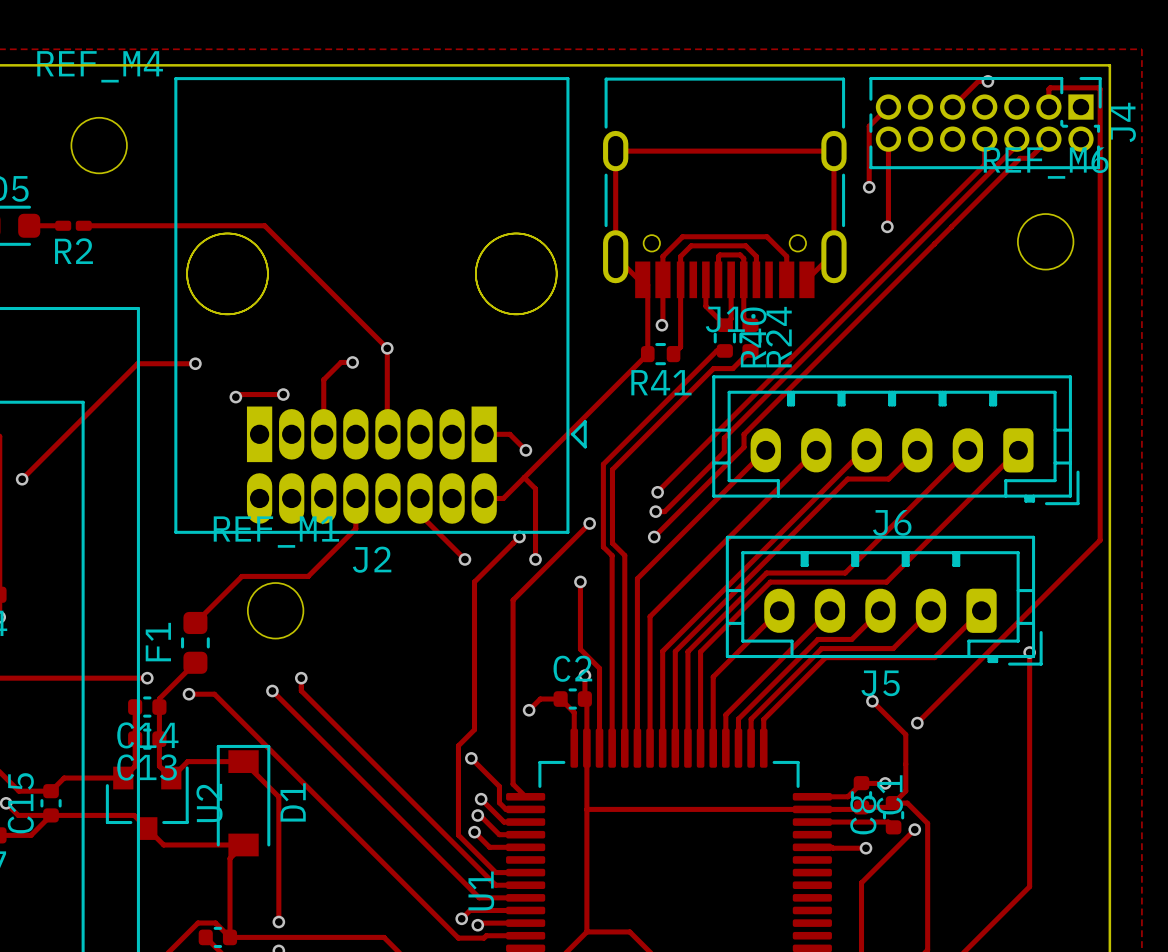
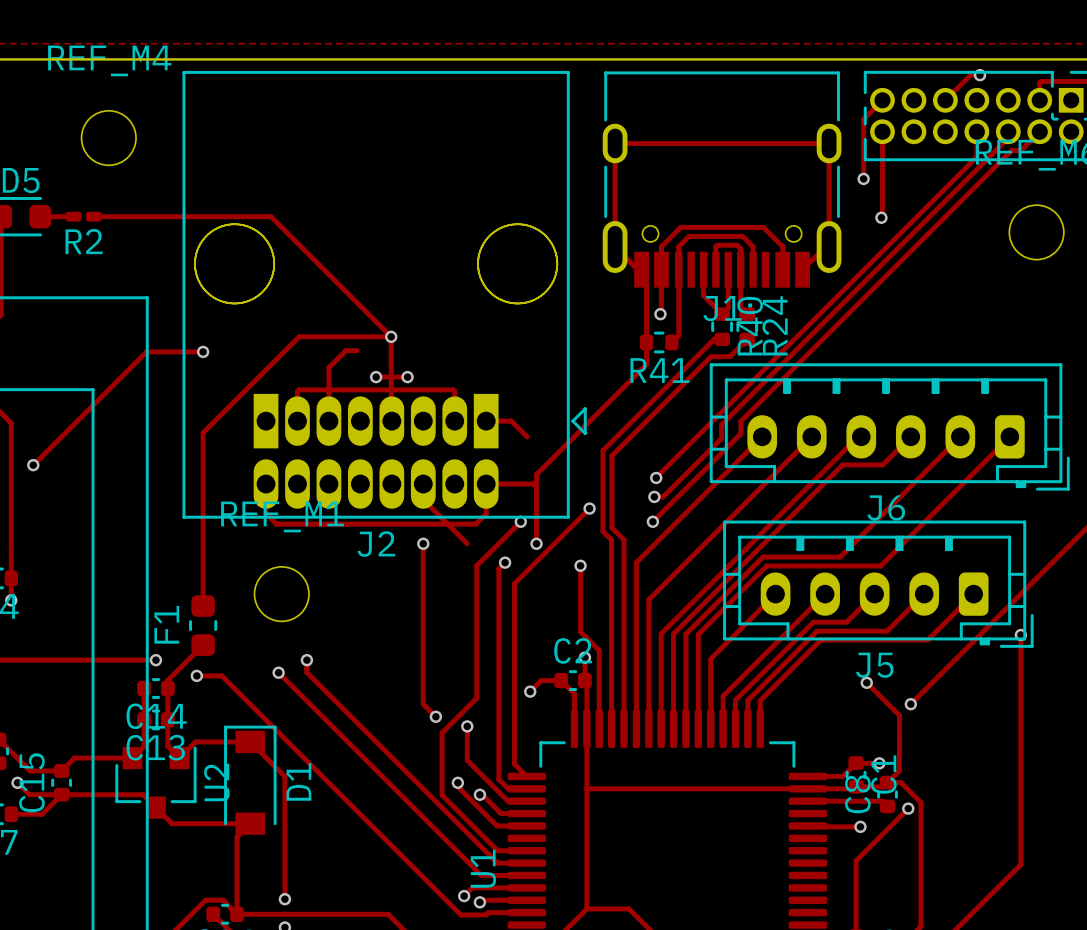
track: (647, 354) (503, 498) -> (646, 342) (646, 364) (536, 474)
via: (352, 362) -> none
track: none -> (376, 377) (407, 377)
via: none -> (376, 377)
via: none -> (407, 377)
track: (283, 394) (238, 394) (235, 397) -> none
via: (283, 394) -> none
via: (235, 397) -> none
track: none -> (297, 421) (298, 389) (453, 389) (454, 421)
via: (525, 450) -> none
track: (524, 477) (535, 488) -> none
track: none -> (266, 484) (266, 513) (276, 524) (475, 524) (486, 513) (486, 484)
track: (355, 498) (355, 528) (308, 576) (241, 576) (195, 622) -> (391, 336) (299, 336) (203, 432) (203, 606)
track: none -> (505, 484) (533, 484) (536, 487)
track: none -> (423, 543) (423, 704) (435, 716)
via: none -> (423, 543)
via: (464, 559) -> none
via: none -> (505, 562)
track: (474, 717) (474, 729) (458, 745) (458, 835) -> (476, 698) (442, 732) (442, 795) (460, 814)
via: none -> (435, 716)
track: (471, 758) (499, 786) (499, 802) (506, 809) -> (505, 562) (498, 568) (498, 779) (508, 788)
via position: (471, 758) -> (467, 726)
track: (481, 799) (504, 822) (506, 822) -> (467, 726) (467, 760) (508, 801)
via: (481, 799) -> none
via: none -> (457, 782)
track: (474, 832) (489, 847) (495, 847) -> (457, 782) (457, 786) (497, 825)
via: (474, 832) -> none

